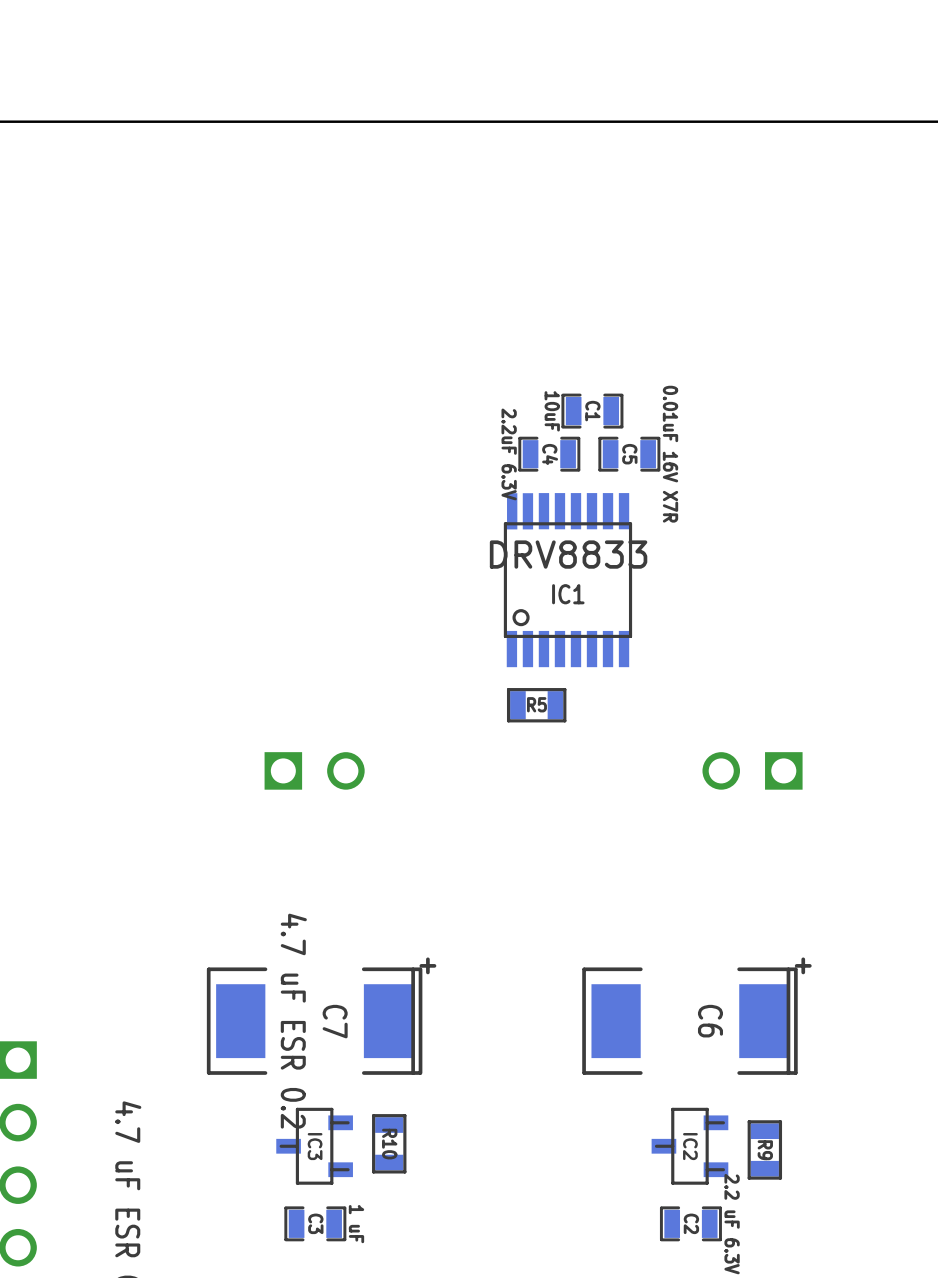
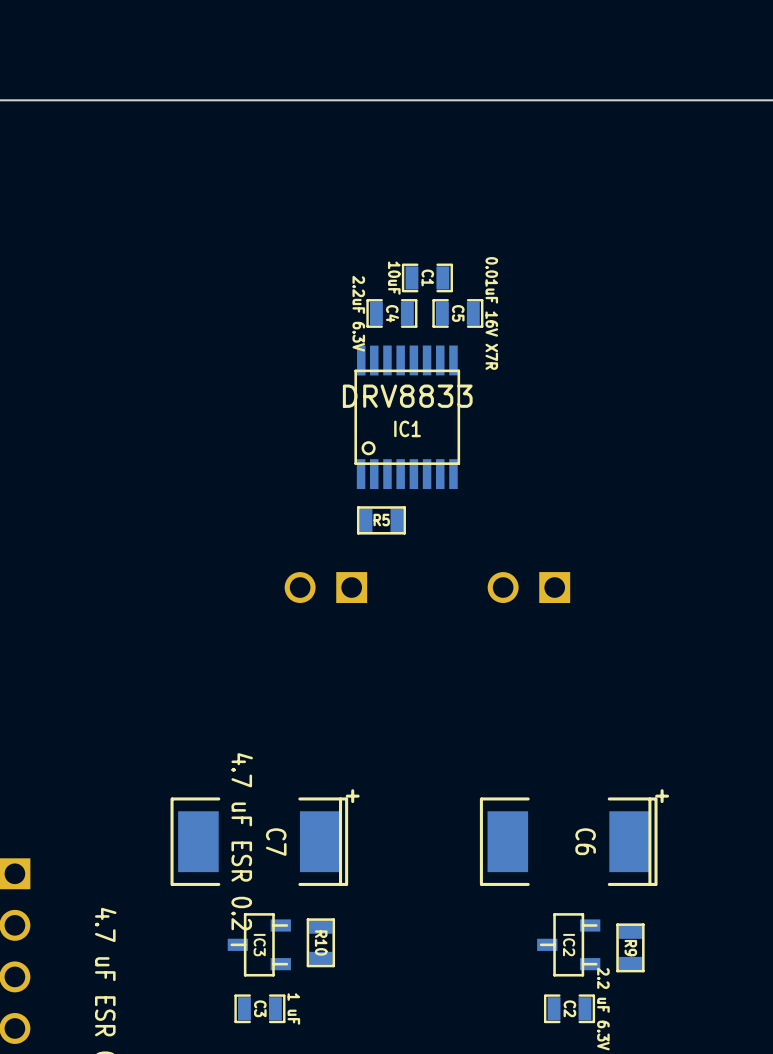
C1 position: (592, 411) -> (427, 277)
C4 position: (549, 454) -> (391, 313)
C5 position: (629, 454) -> (457, 313)
IC1 position: (567, 580) -> (407, 417)
R5 position: (536, 705) -> (381, 520)
part rotation: 0° (314, 770) -> 180° (325, 587)
part position: (314, 770) -> (325, 587)
part position: (752, 770) -> (528, 587)

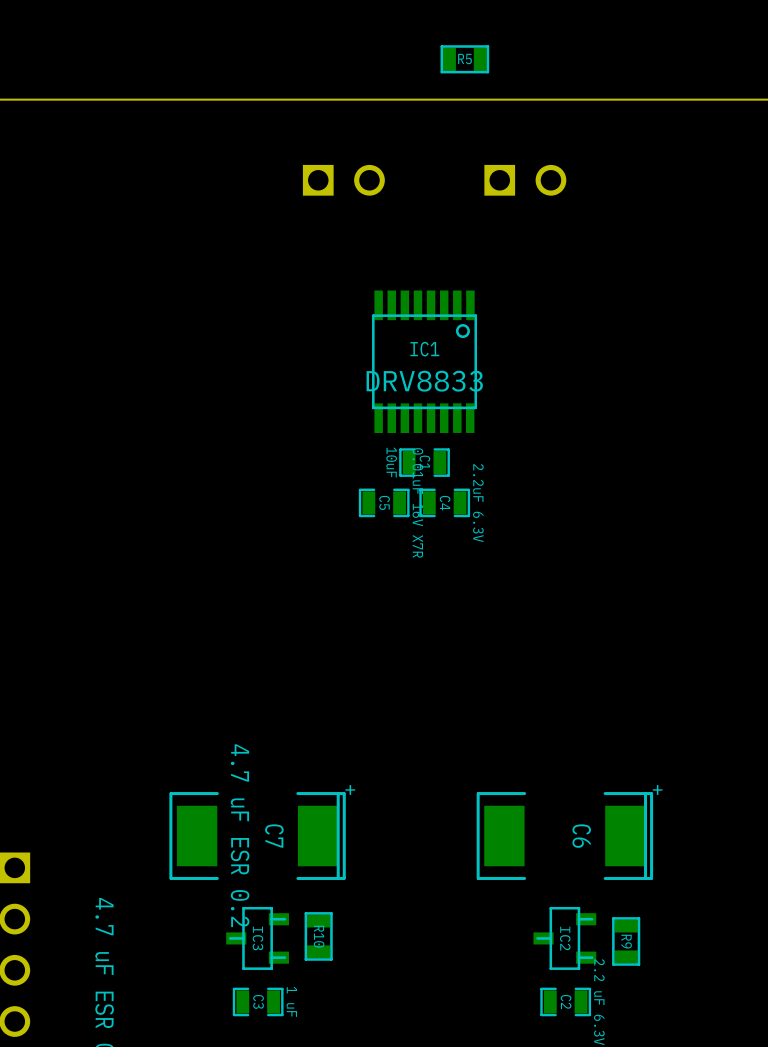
part: none -> (343, 180)
part: none -> (525, 180)
C1 position: (427, 277) -> (424, 462)
C4 value position: 2.2uF 6.3V (358, 313) -> 2.2uF 6.3V (478, 503)
C4 position: (391, 313) -> (444, 502)
C5 position: (457, 313) -> (384, 502)
IC1 rotation: 0° (407, 417) -> 180° (424, 361)
R5 position: (381, 520) -> (464, 59)
part: (325, 587) -> none
part: (528, 587) -> none

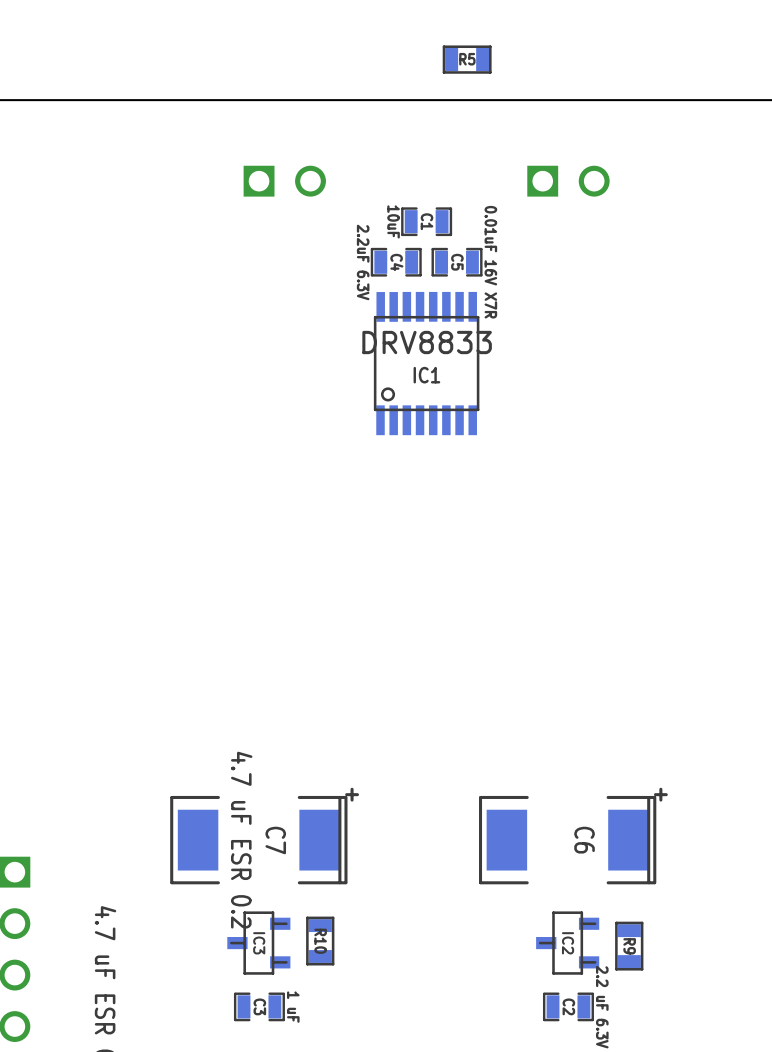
part position: (343, 180) -> (284, 181)
part position: (525, 180) -> (568, 181)
IC1 rotation: 0° (424, 361) -> 180° (426, 363)
C1 position: (424, 462) -> (426, 221)
C5 position: (384, 502) -> (457, 262)
C4 position: (444, 502) -> (396, 262)
C4 value position: 2.2uF 6.3V (478, 503) -> 2.2uF 6.3V (363, 262)

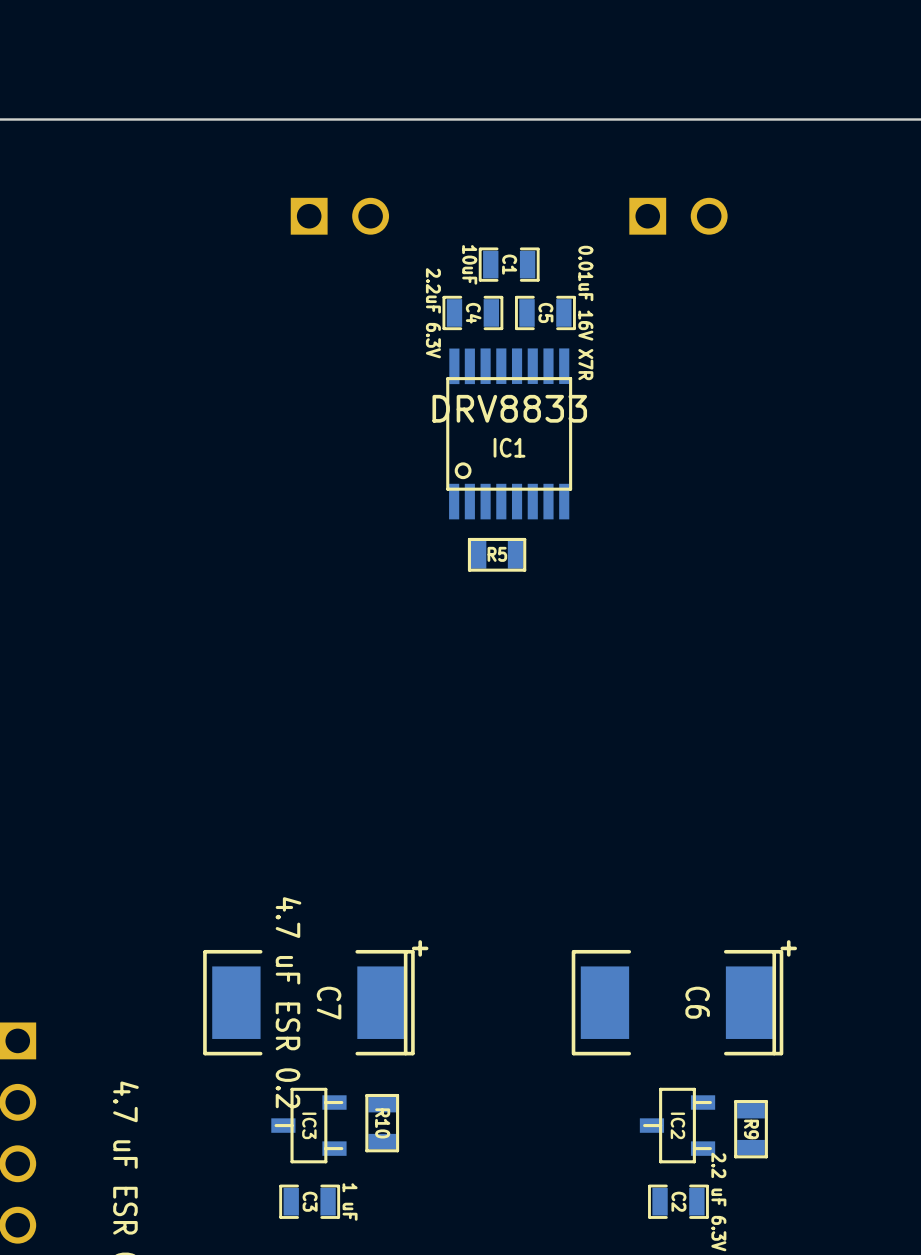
R5 position: (467, 59) -> (497, 554)

